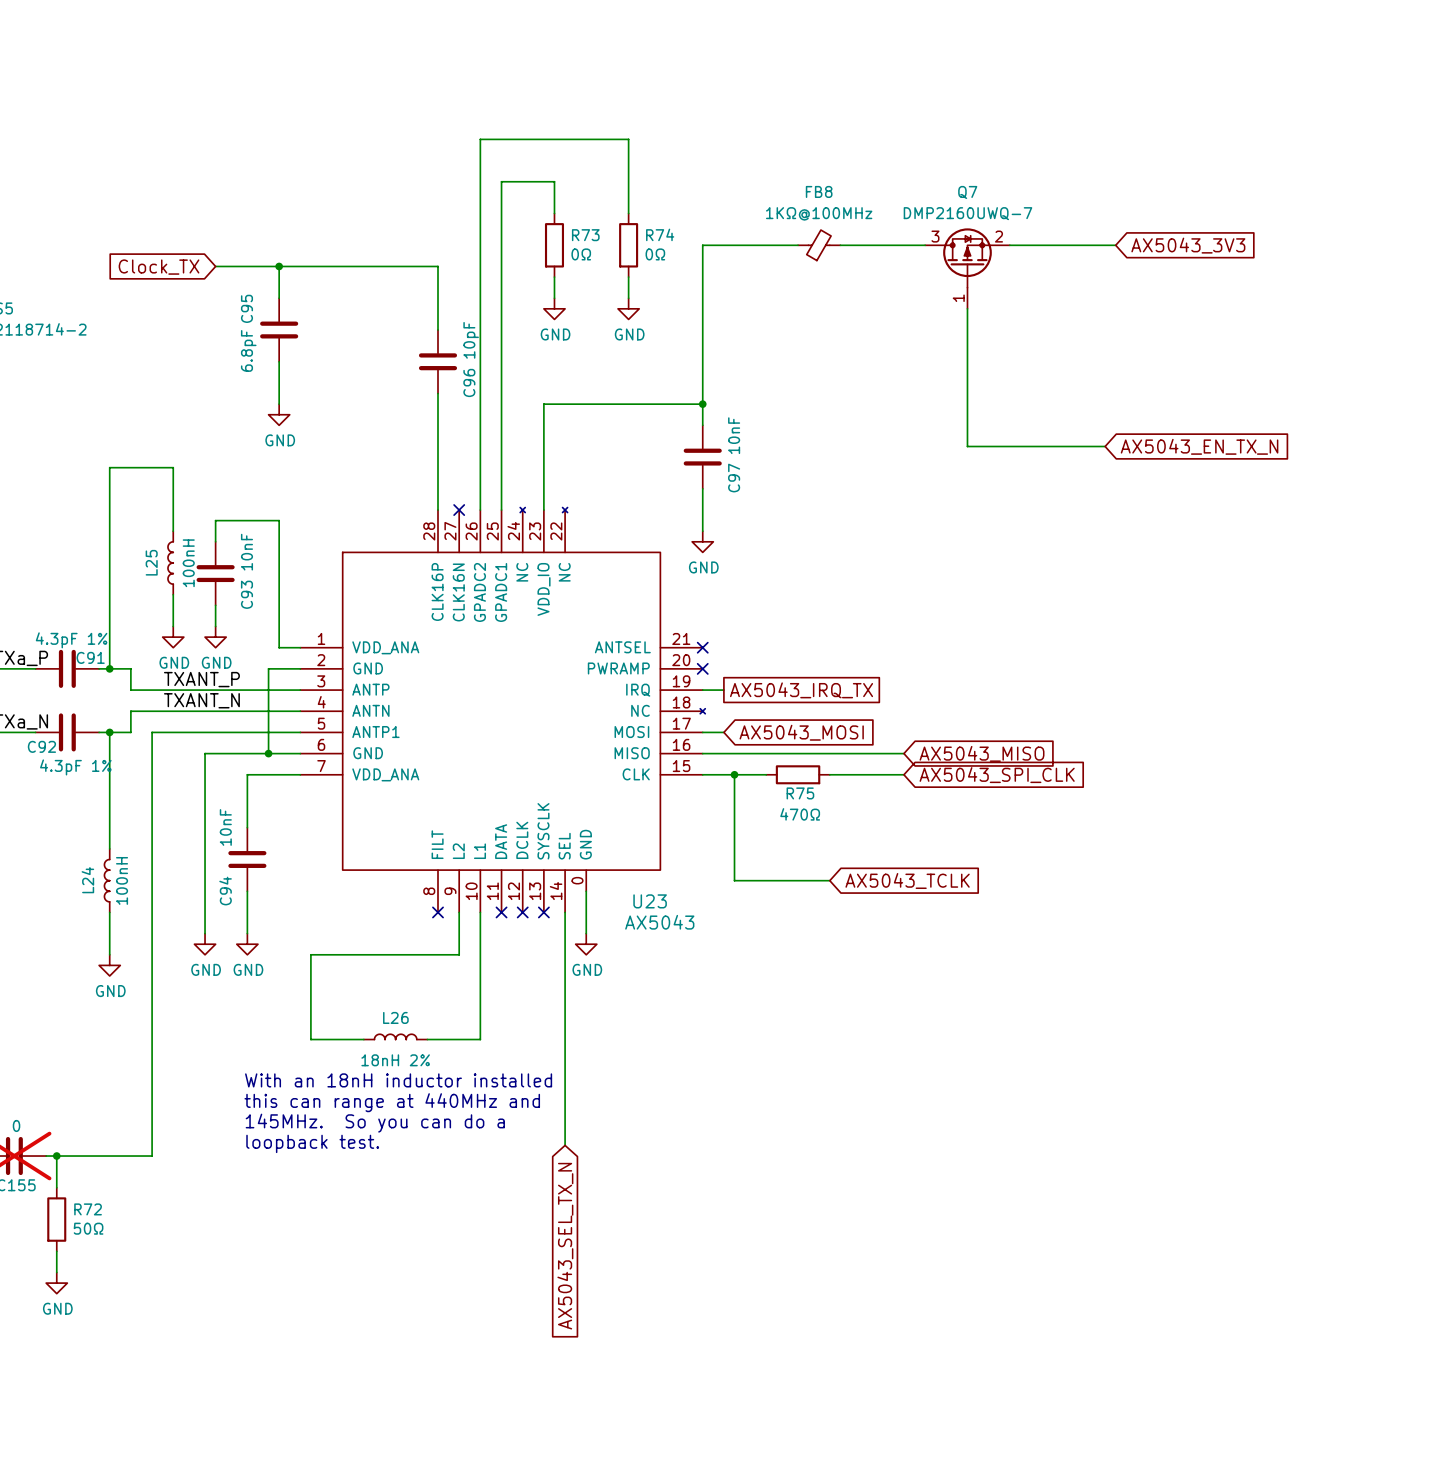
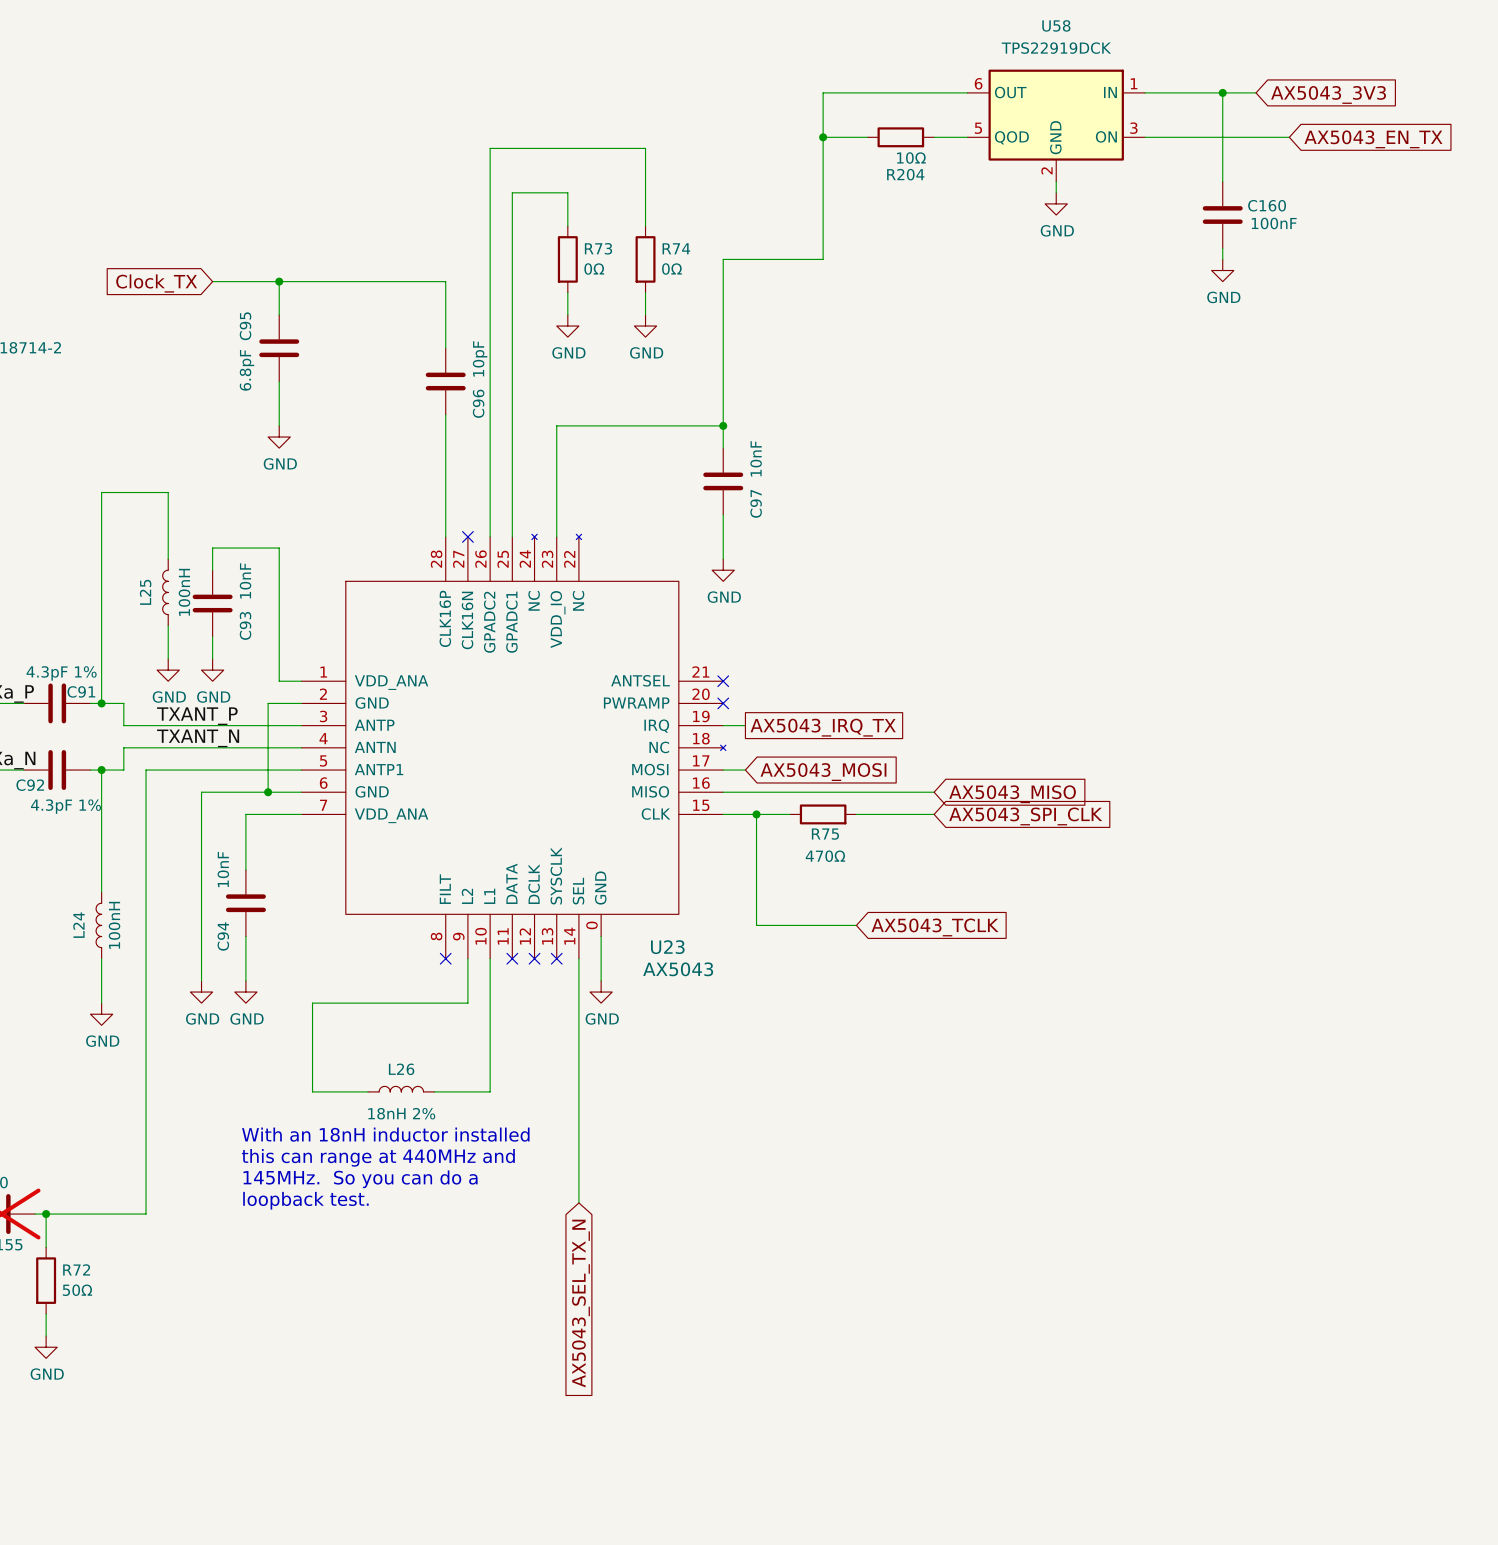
wire: none -> (967, 92) (823, 92) (823, 259)
wire: none -> (1222, 92) (1222, 181)
junction: none -> (1222, 92)
U58: none -> TPS22919DCK (1056, 125)
wire: none -> (823, 137) (867, 137)
junction: none -> (823, 137)
R204: none -> 10Ω (900, 137)
wire: none -> (934, 137) (967, 137)
wire: none -> (1145, 137) (1289, 137)
global label: none -> AX5043_EN_TX (1373, 139)
wire: none -> (1056, 181) (1056, 192)
power symbol: none -> GND (1056, 203)
C160: none -> 100nF (1222, 215)
wire: none -> (1222, 248) (1222, 259)
FB8: 1KΩ@100MHz (819, 245) -> none
wire: (840, 245) (925, 245) -> none
wire: (1009, 245) (1115, 245) -> (1145, 92) (1256, 92)
global label position: AX5043_3V3 (1188, 245) -> AX5043_3V3 (1328, 94)
power symbol: none -> GND (1222, 270)
Q7: DMP2160UWQ-7 (967, 268) -> none
wire: (967, 308) (967, 446) (1105, 446) -> none
global label: AX5043_EN_TX_N (1199, 446) -> none

